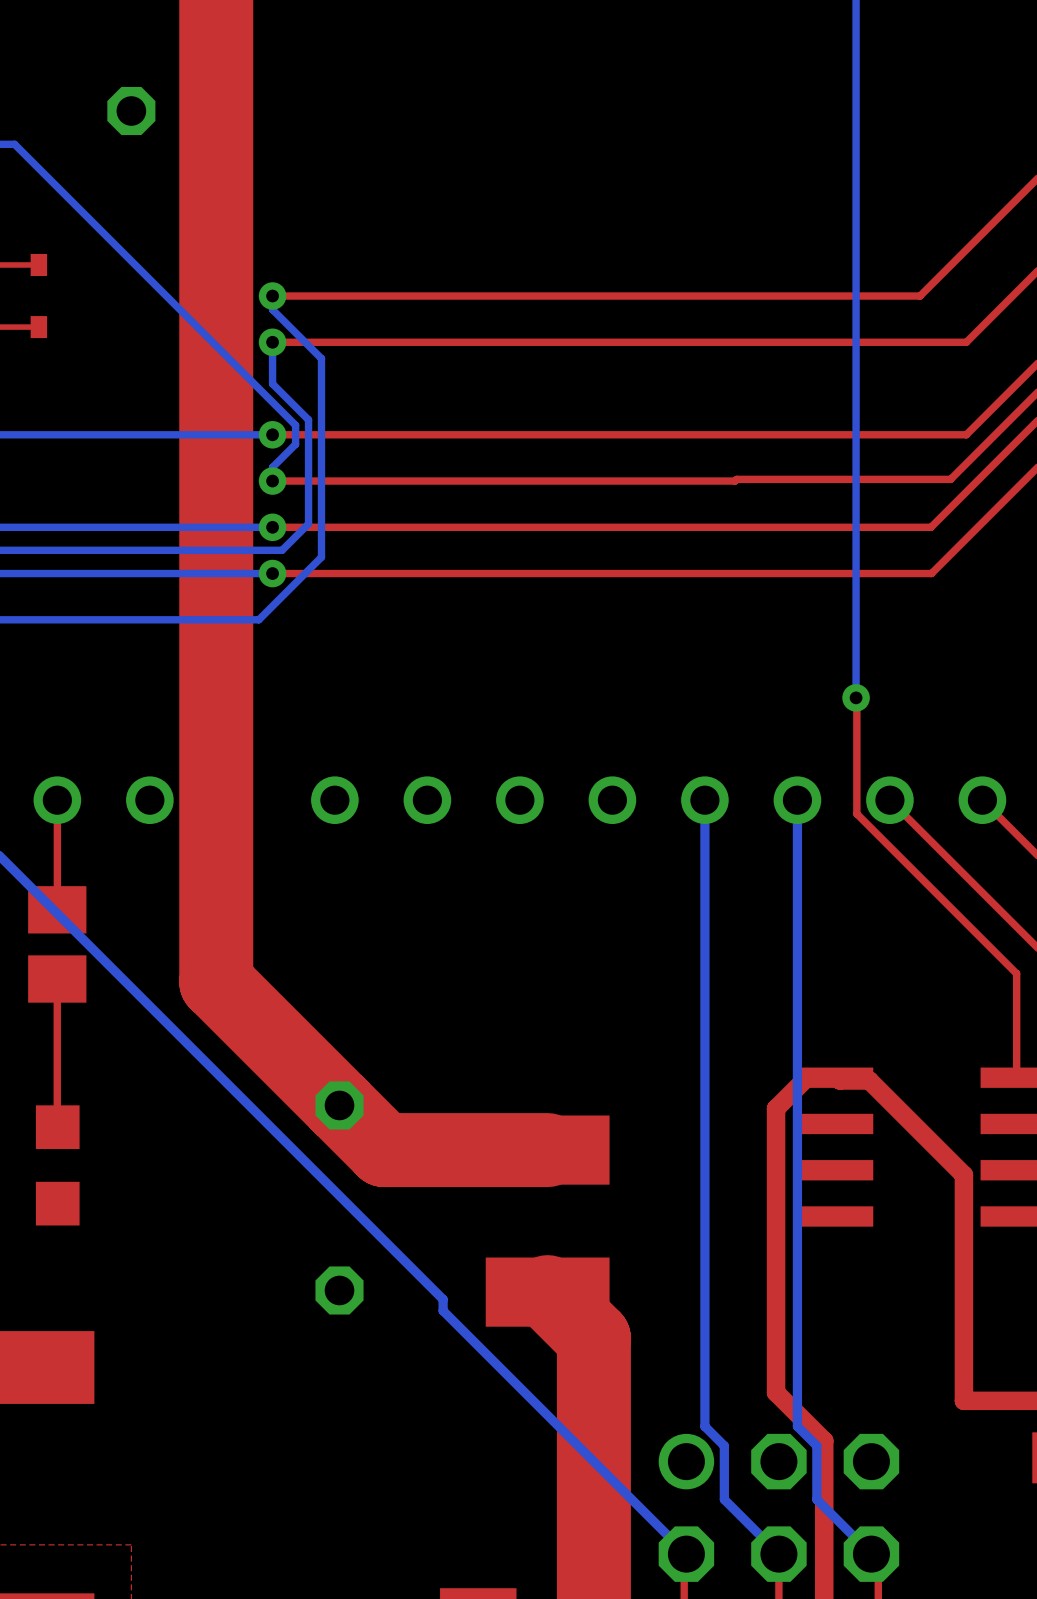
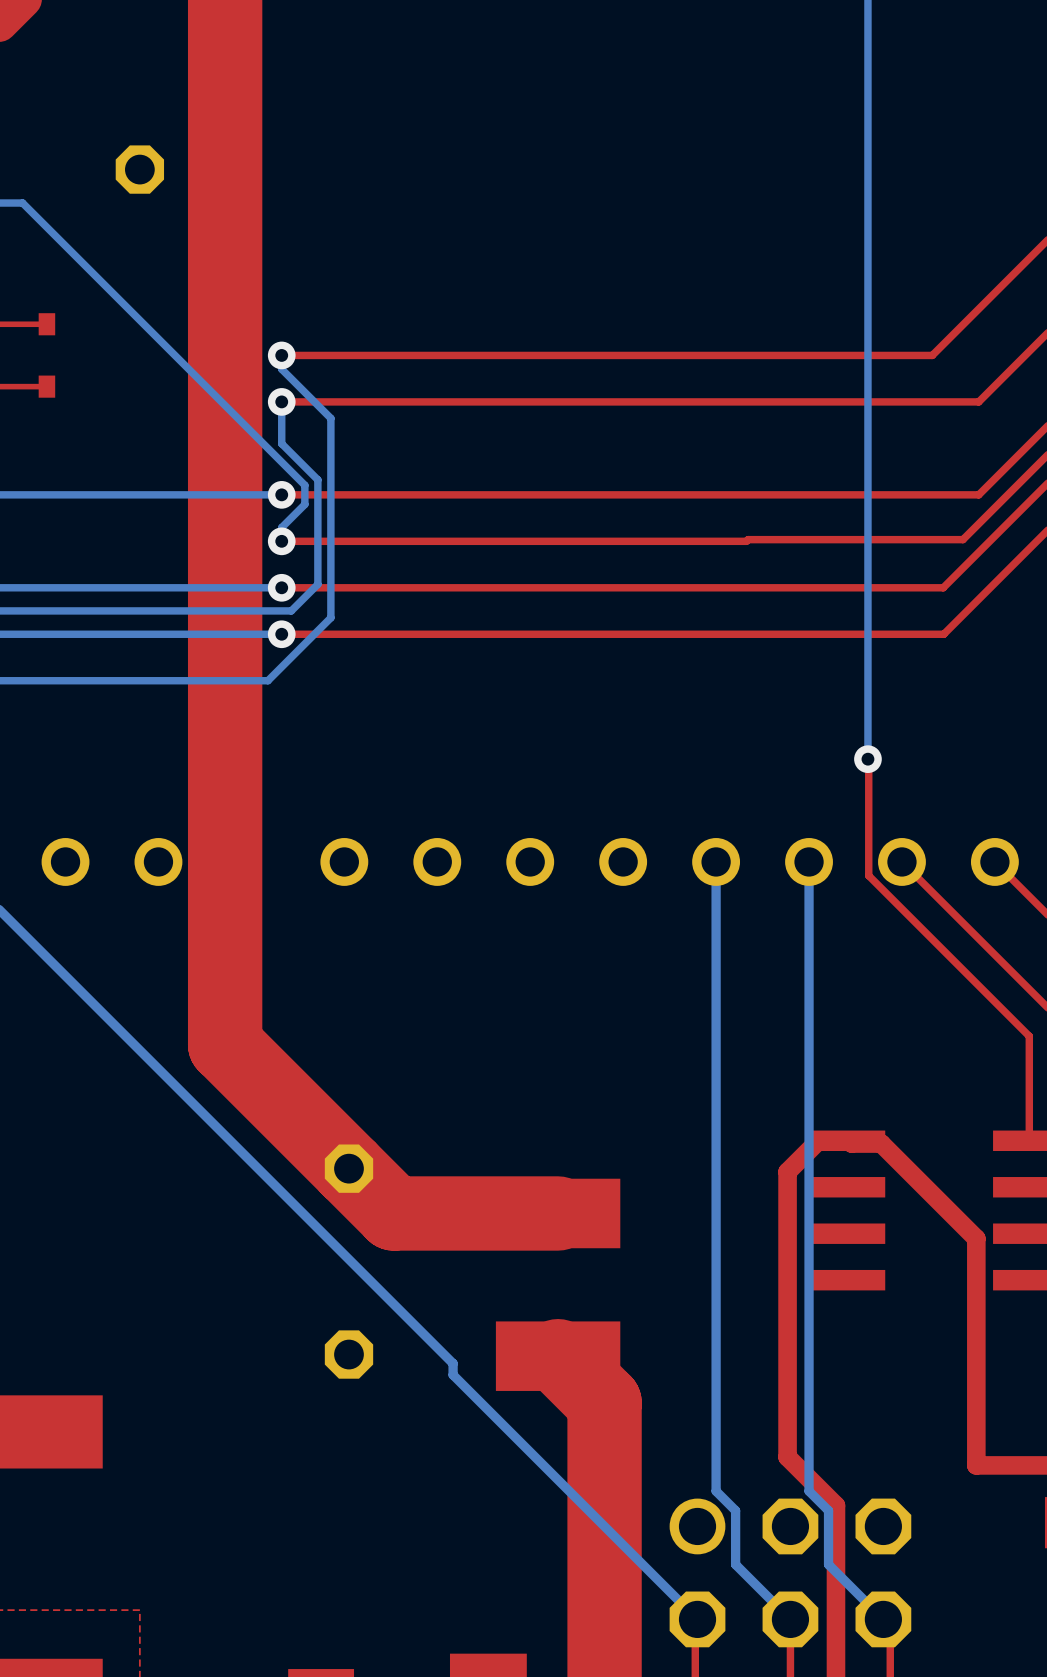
top track: (57, 800) (57, 909) -> none
part: (57, 944) -> none
top track: (57, 979) (57, 1126) -> none
part: (57, 1165) -> none

